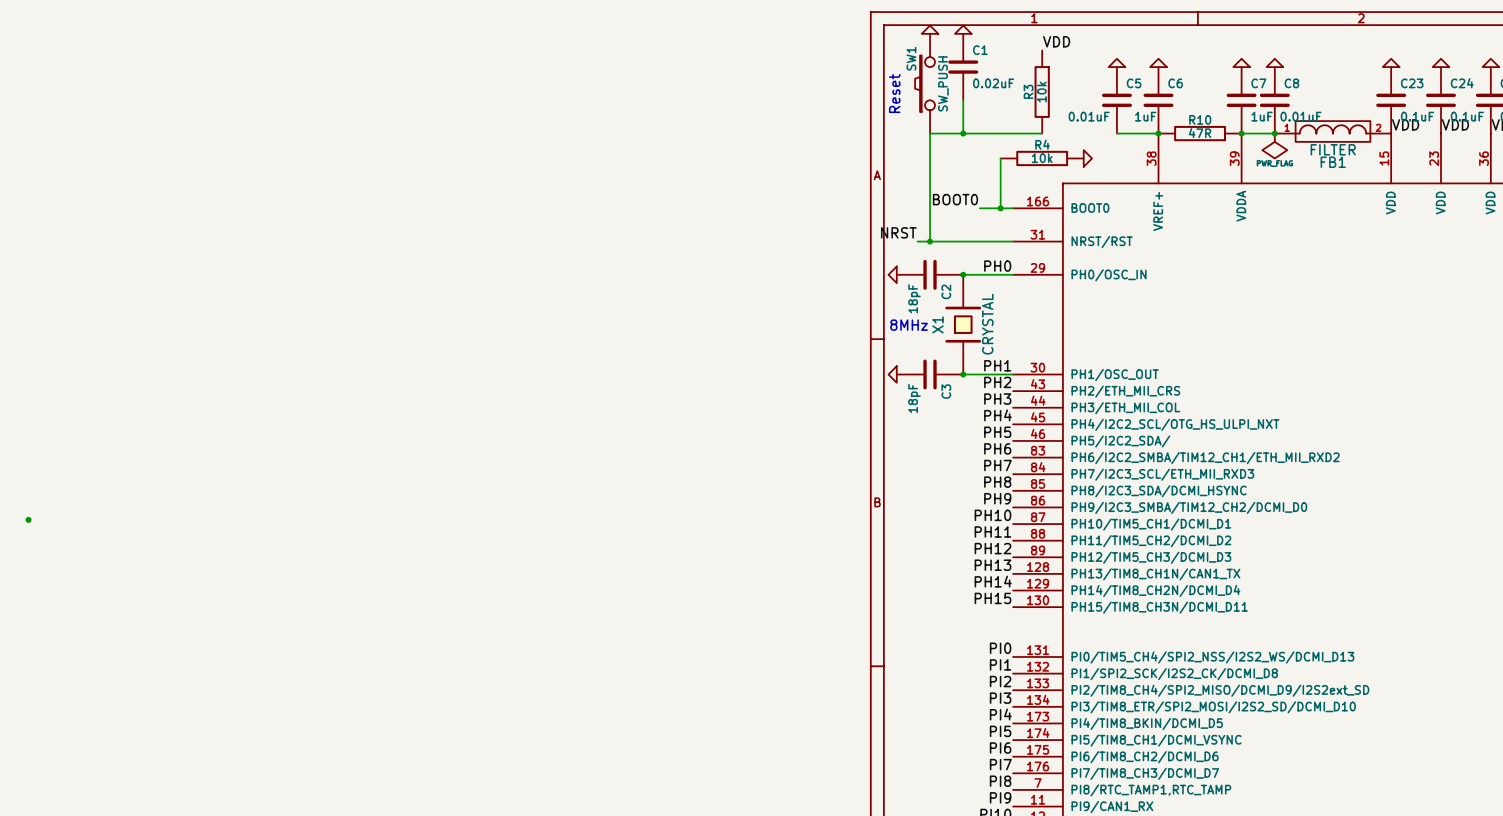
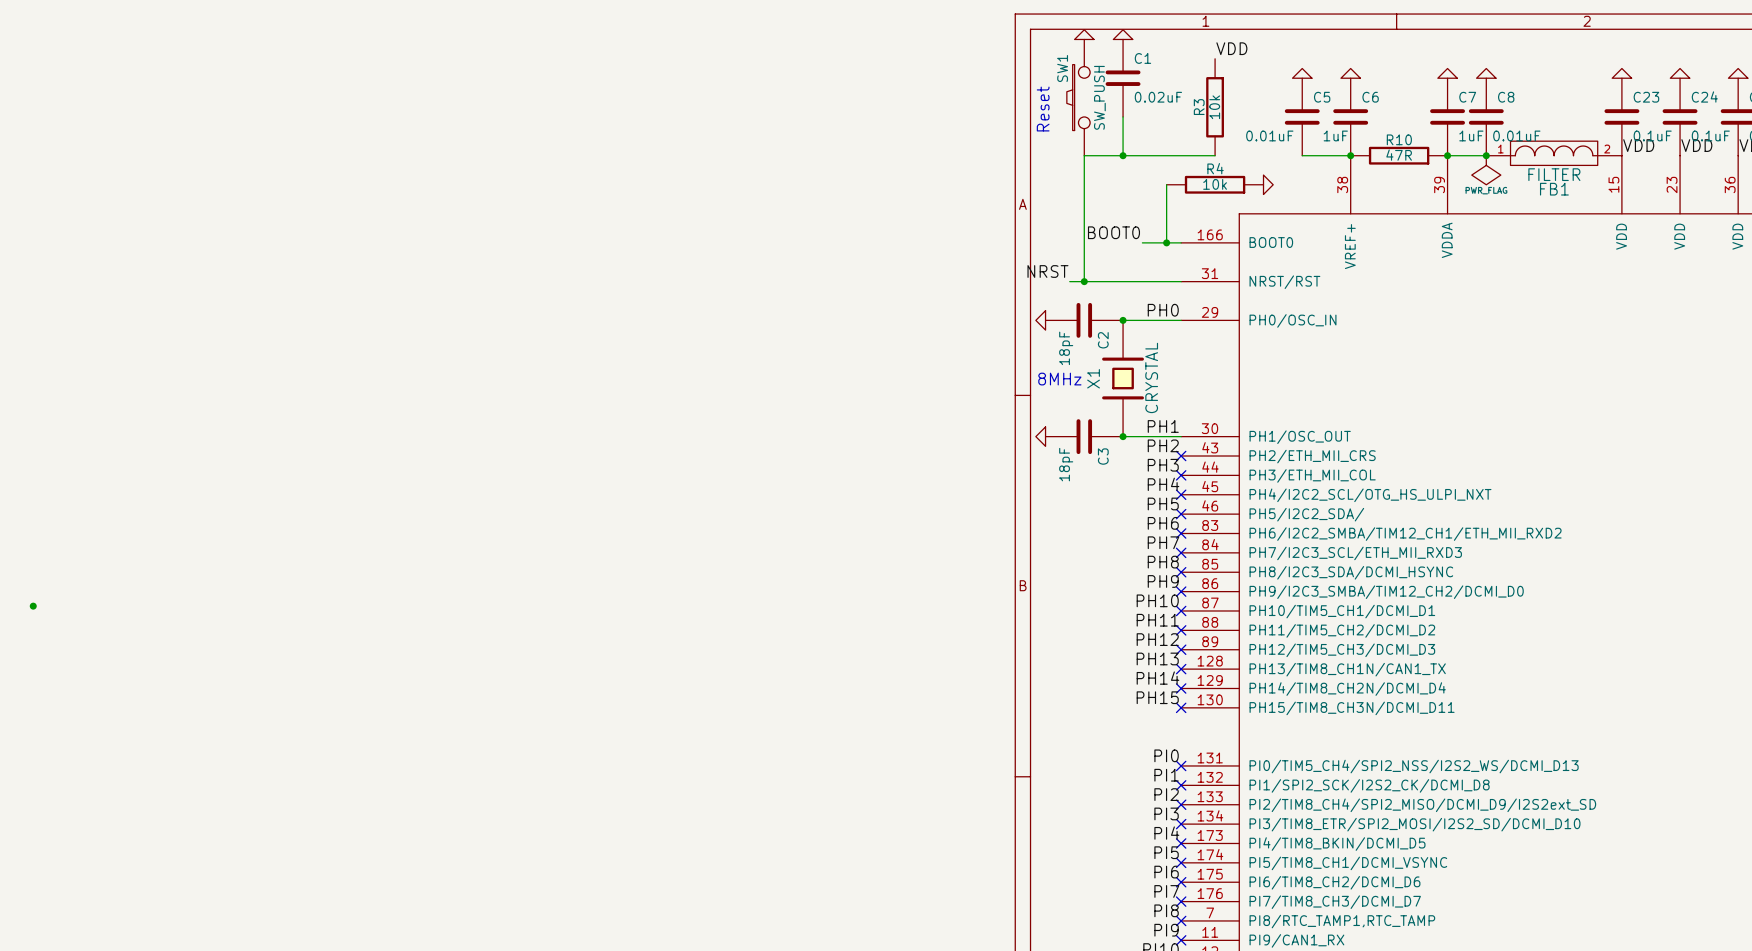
no-connect mark: none -> (1181, 456)
no-connect mark: none -> (1181, 475)
no-connect mark: none -> (1181, 494)
no-connect mark: none -> (1181, 514)
no-connect mark: none -> (1181, 533)
no-connect mark: none -> (1181, 552)
no-connect mark: none -> (1181, 572)
no-connect mark: none -> (1181, 591)
no-connect mark: none -> (1181, 610)
no-connect mark: none -> (1181, 630)
no-connect mark: none -> (1181, 649)
no-connect mark: none -> (1181, 669)
no-connect mark: none -> (1181, 688)
no-connect mark: none -> (1181, 707)
no-connect mark: none -> (1181, 765)
no-connect mark: none -> (1181, 785)
no-connect mark: none -> (1181, 804)
no-connect mark: none -> (1181, 824)
no-connect mark: none -> (1181, 843)
no-connect mark: none -> (1181, 862)
no-connect mark: none -> (1181, 882)
no-connect mark: none -> (1181, 901)
no-connect mark: none -> (1181, 920)
no-connect mark: none -> (1181, 940)

